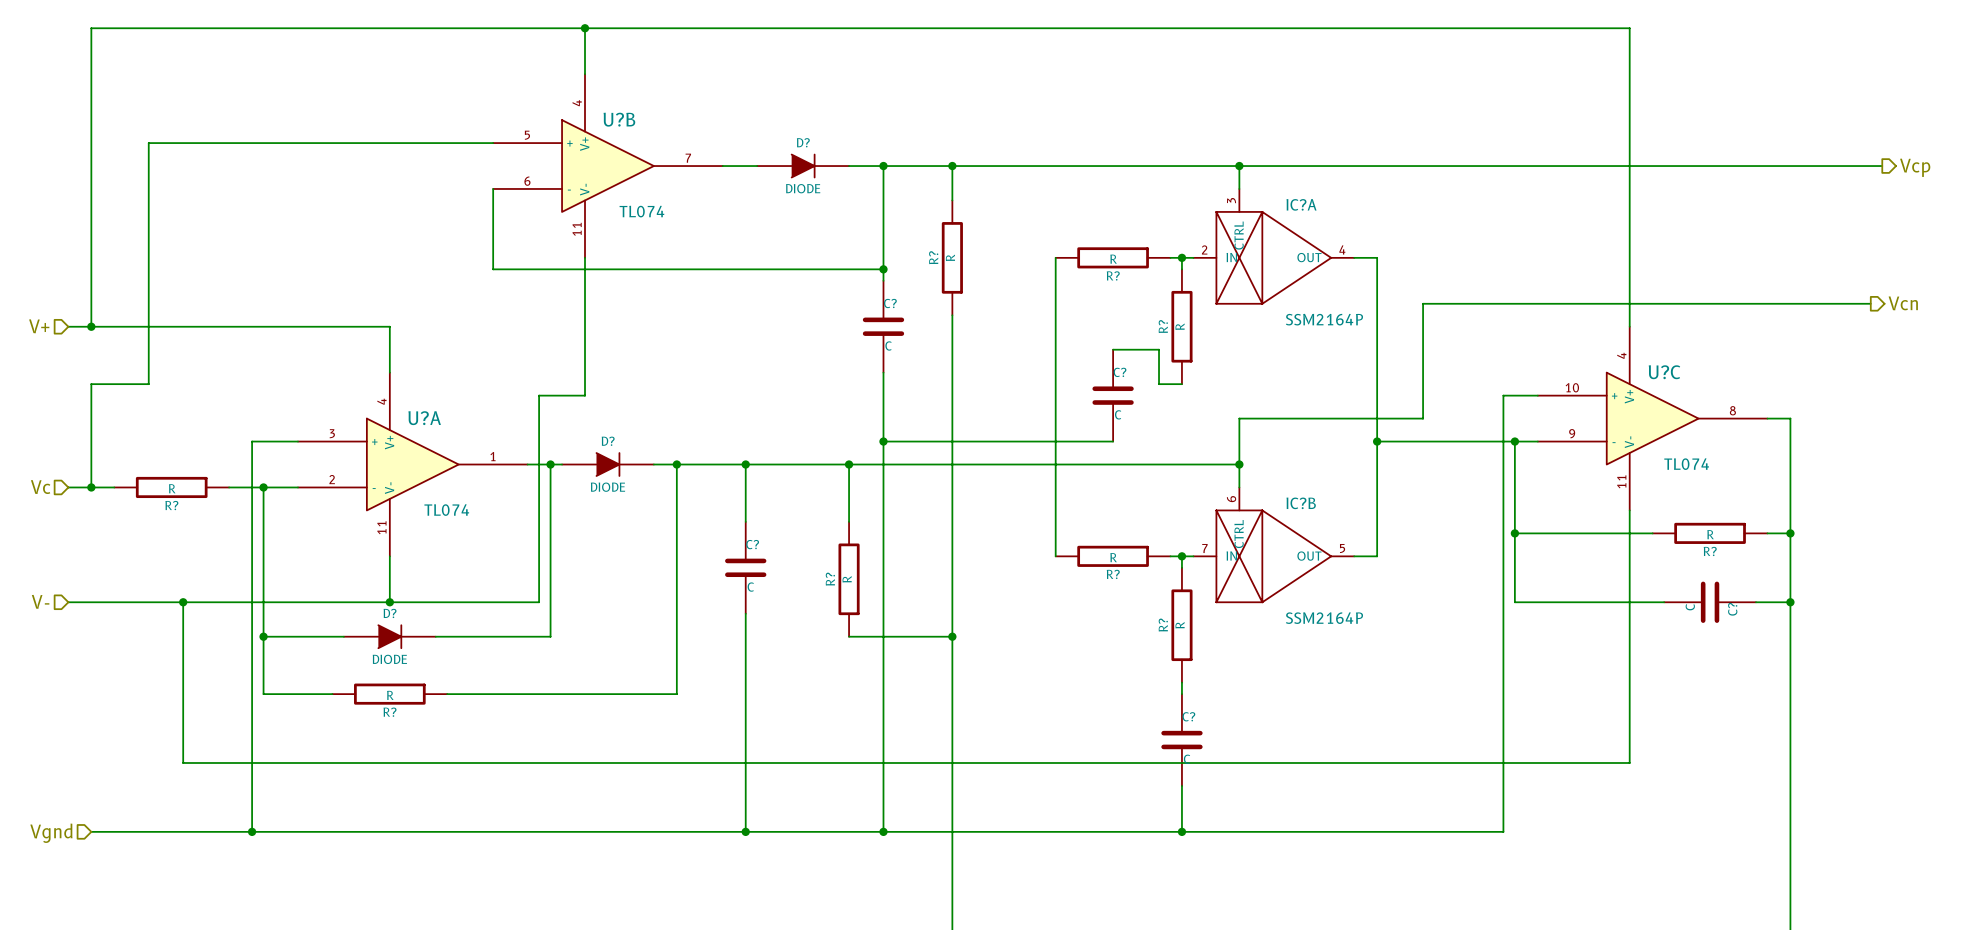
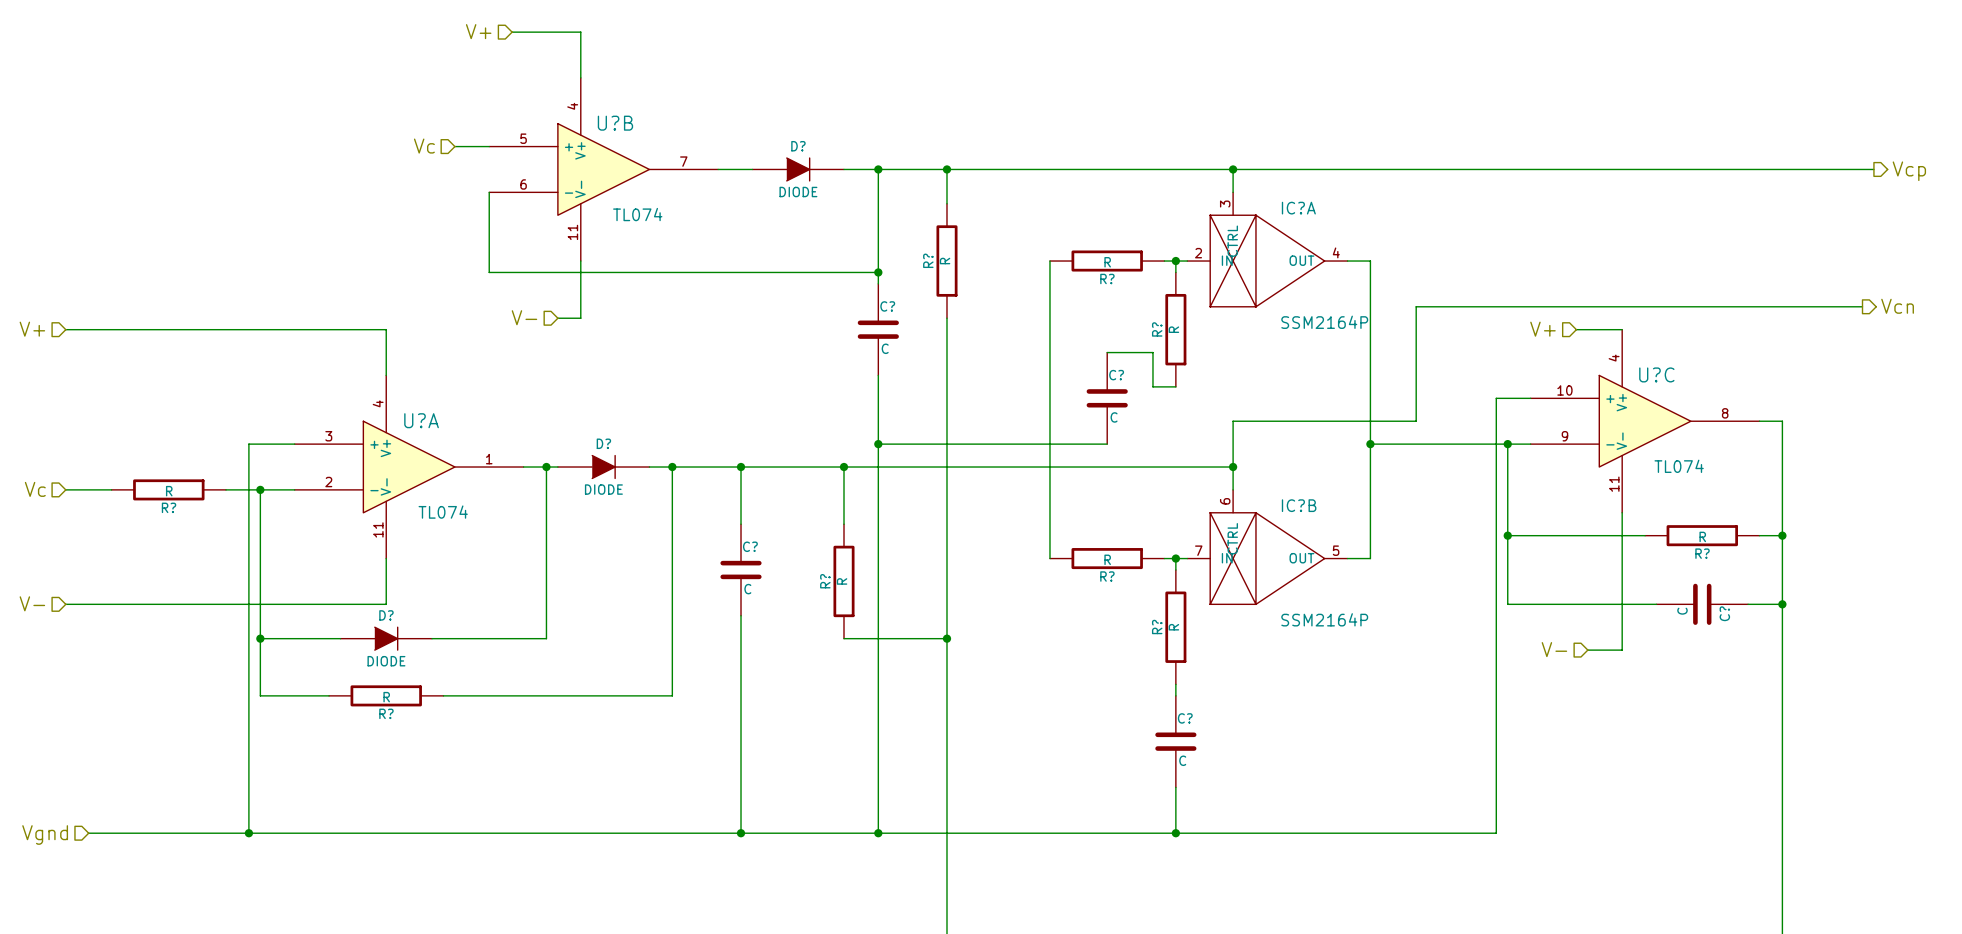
hierarchical label: none -> V+ (478, 31)
wire: (516, 28) (91, 28) (91, 326) -> none
wire: (585, 28) (1629, 28) (1629, 326) -> (1576, 329) (1622, 329)
junction: (585, 28) -> none
hierarchical label: none -> Vc (424, 146)
wire: (458, 143) (148, 143) (148, 384) (91, 384) (91, 487) -> none
hierarchical label: none -> V- (524, 317)
wire: (585, 315) (585, 395) (539, 395) (539, 602) (389, 602) -> (580, 318) (557, 318)
junction: (91, 326) -> none
hierarchical label: none -> V+ (1542, 329)
junction: (91, 487) -> none
wire: (183, 602) (183, 762) (1629, 762) (1629, 648) -> (1587, 650) (1622, 650)
junction: (183, 602) -> none
junction: (389, 602) -> none
hierarchical label: none -> V- (1554, 649)

